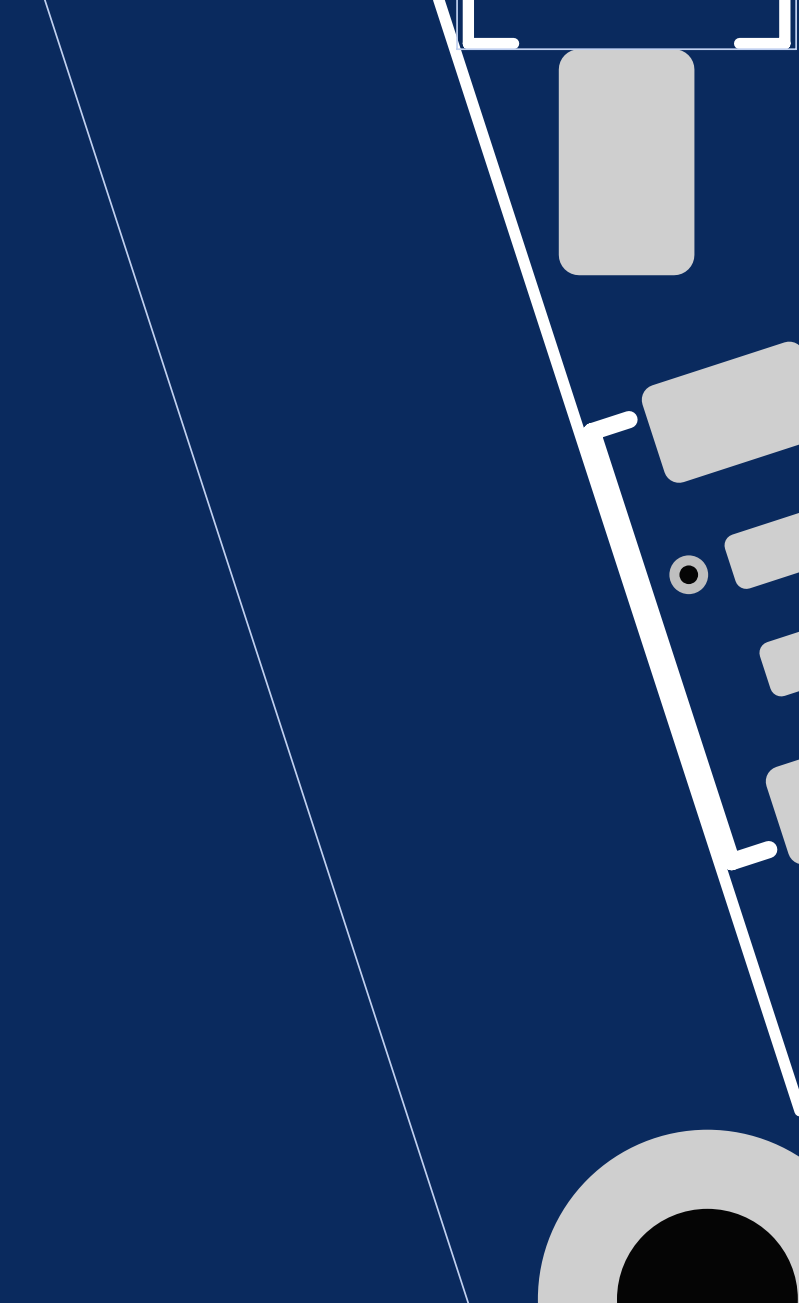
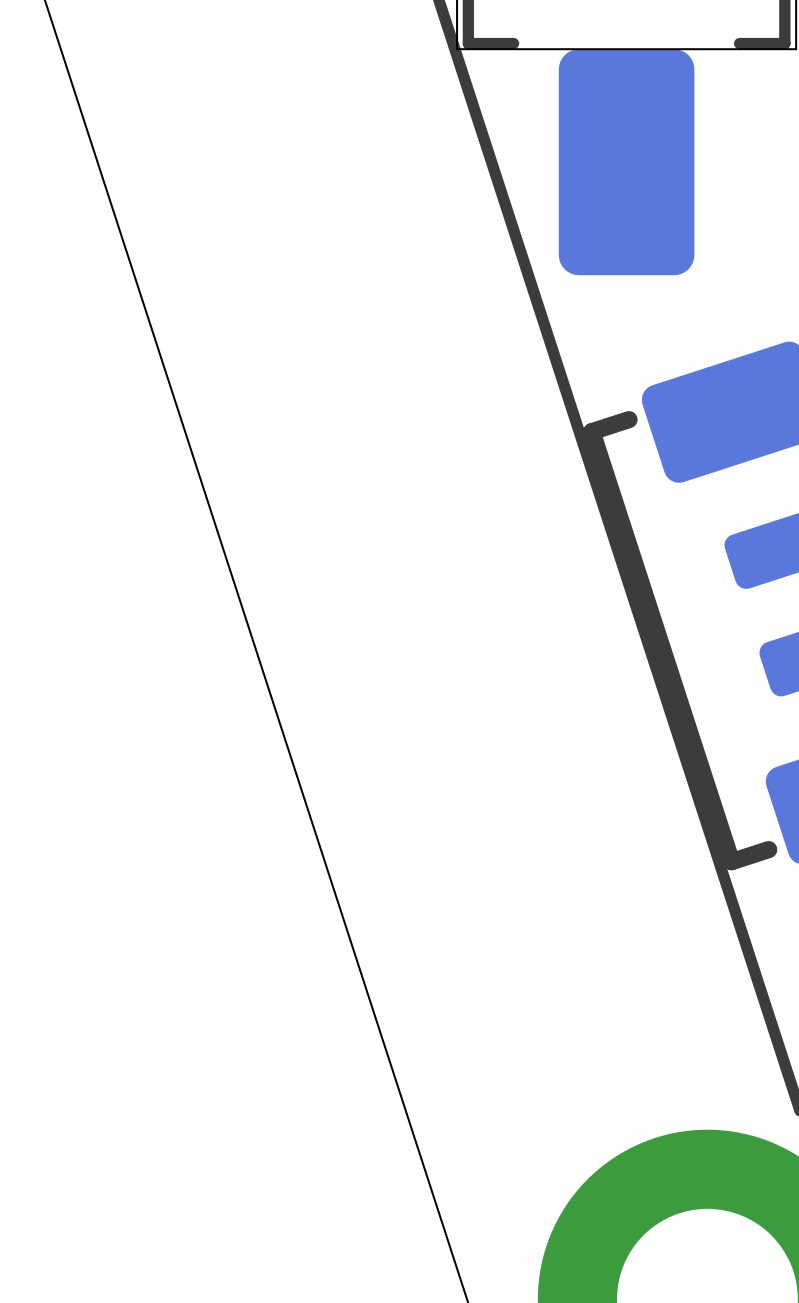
via: (688, 574) -> none

